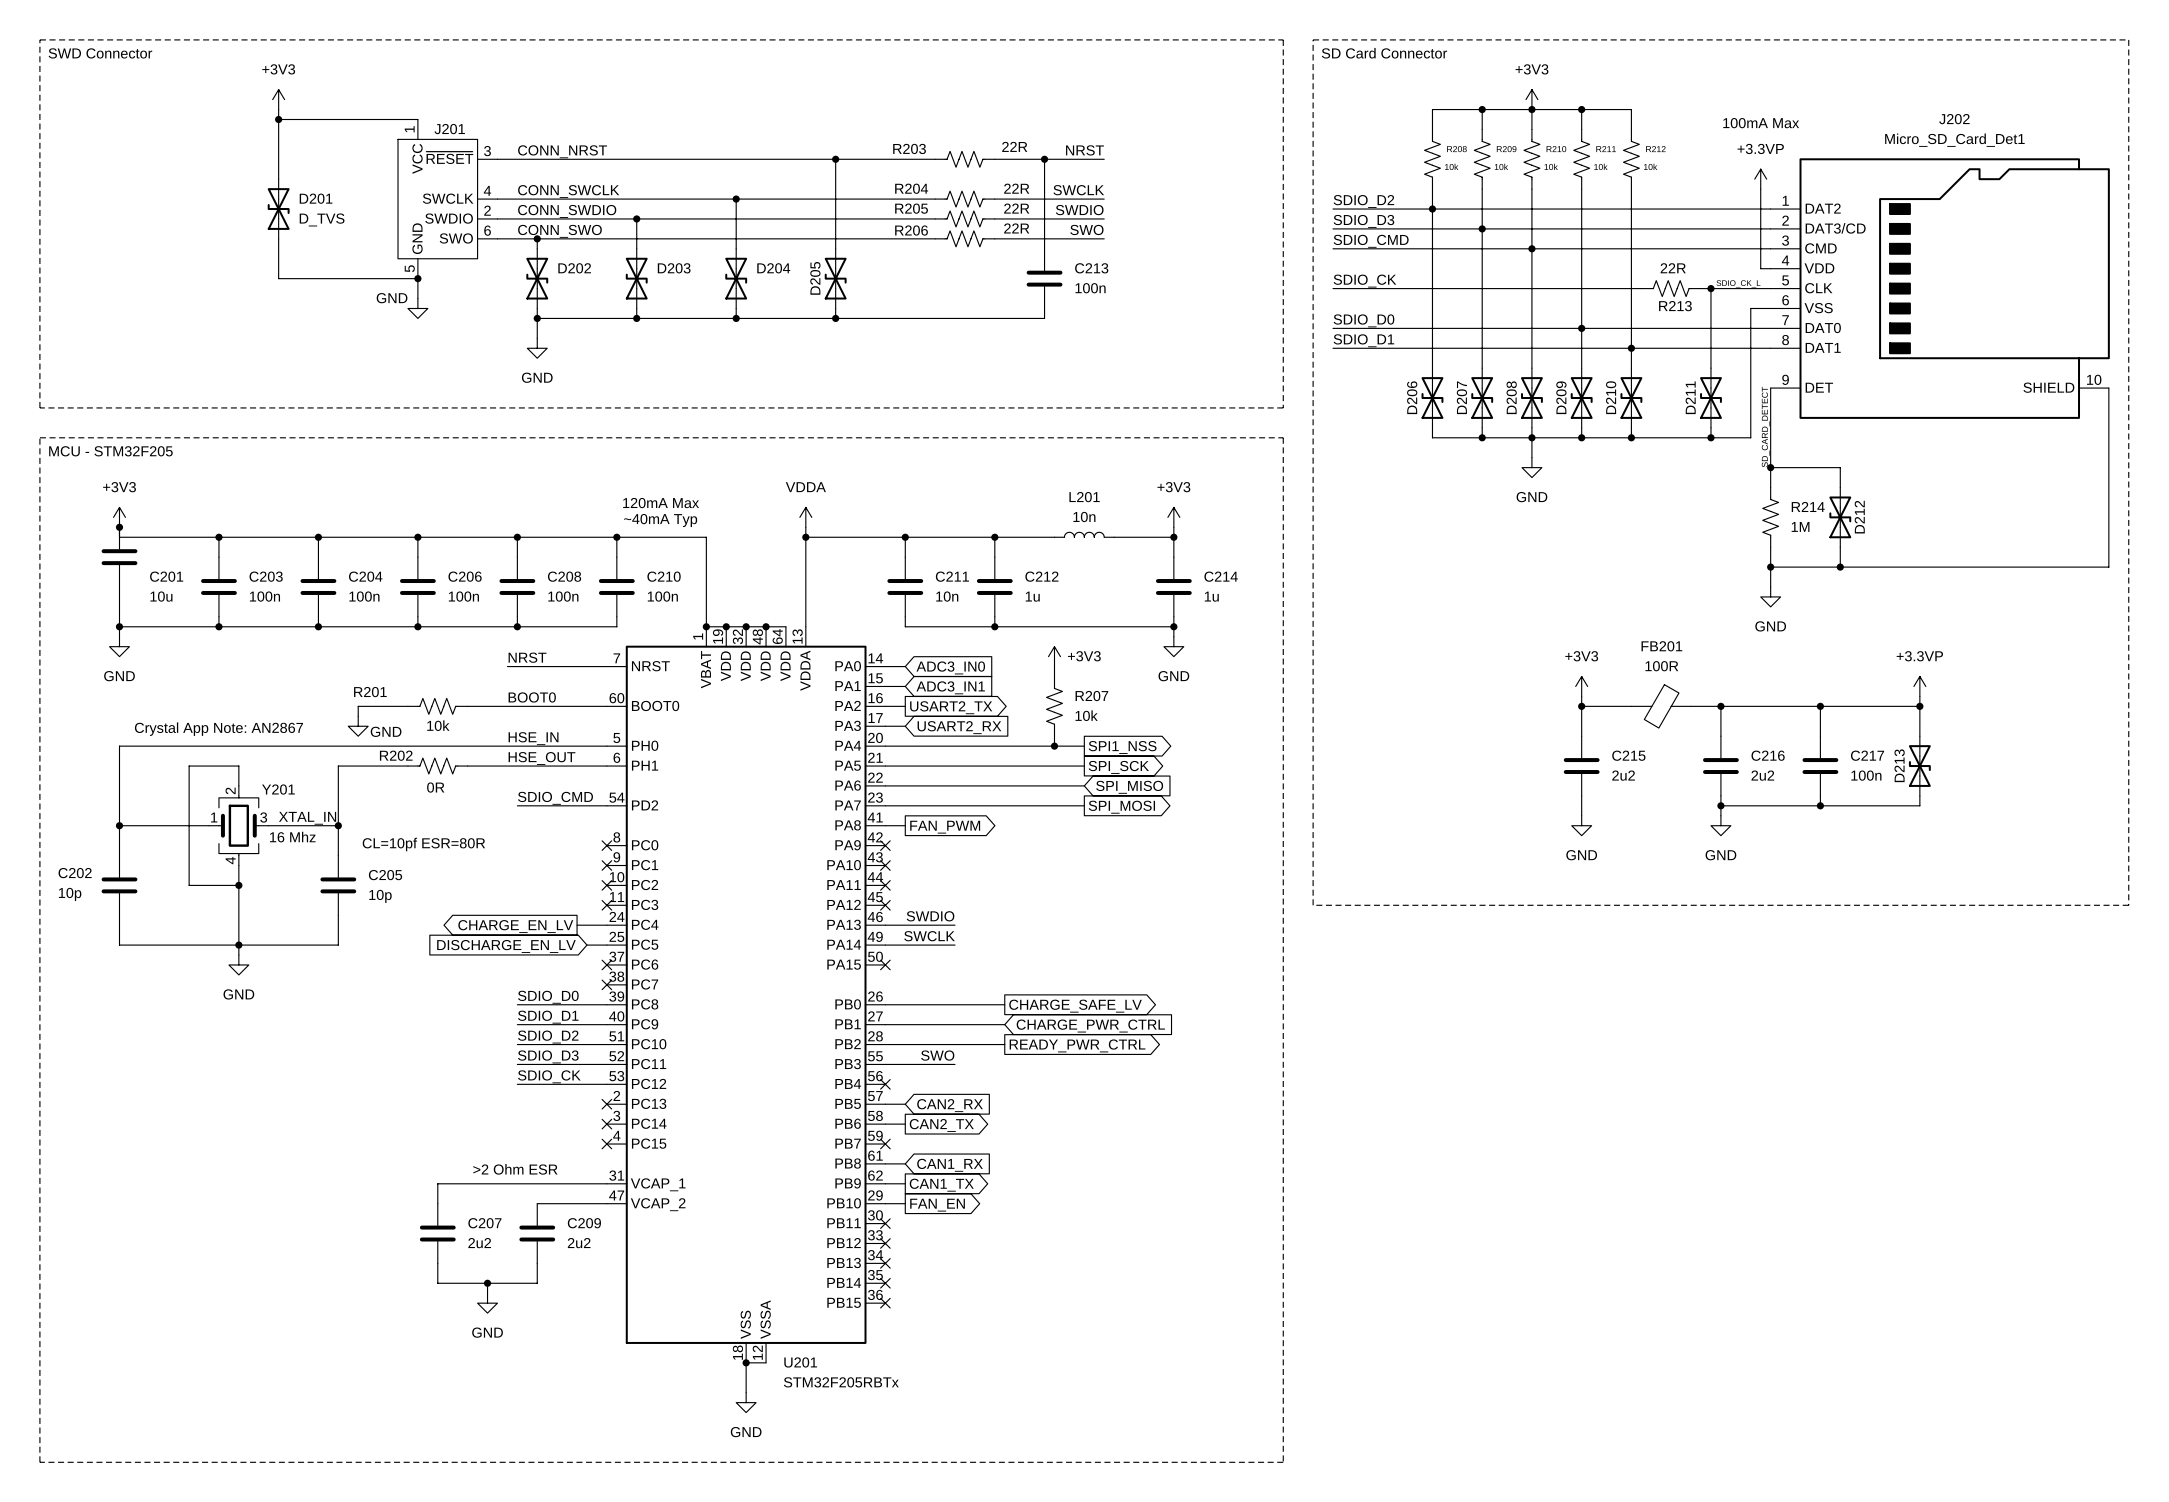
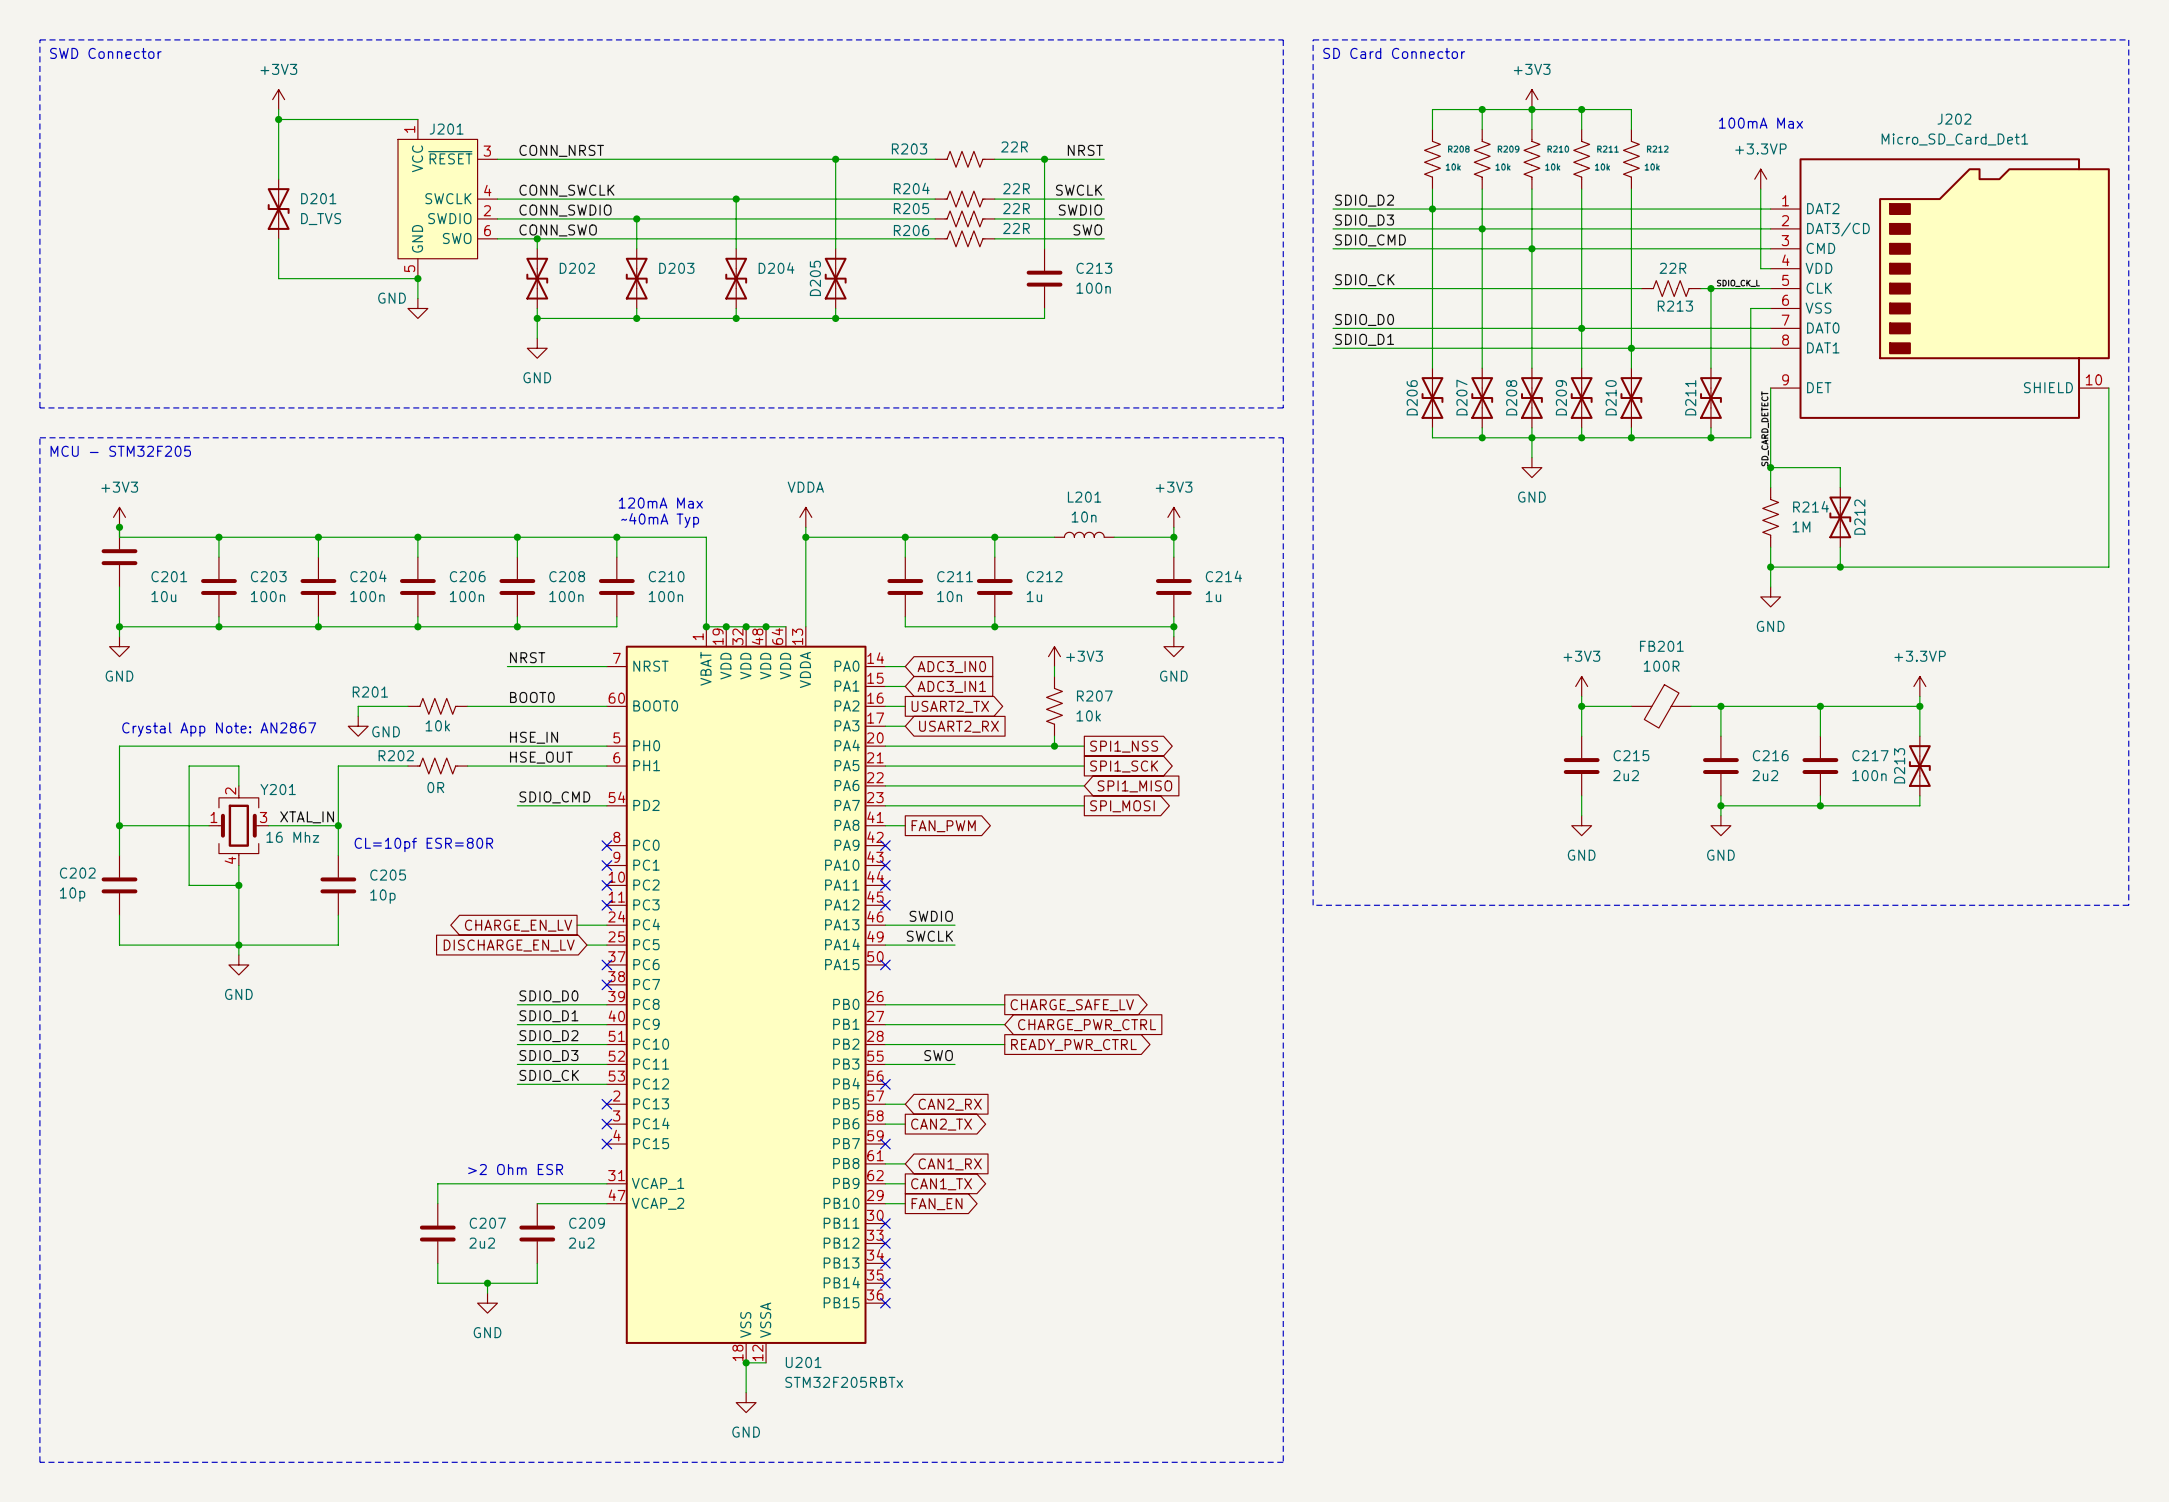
global label: SPI_SCK (1118, 767) -> SPI1_SCK (1124, 766)
global label: SPI_MISO (1129, 787) -> SPI1_MISO (1134, 786)

